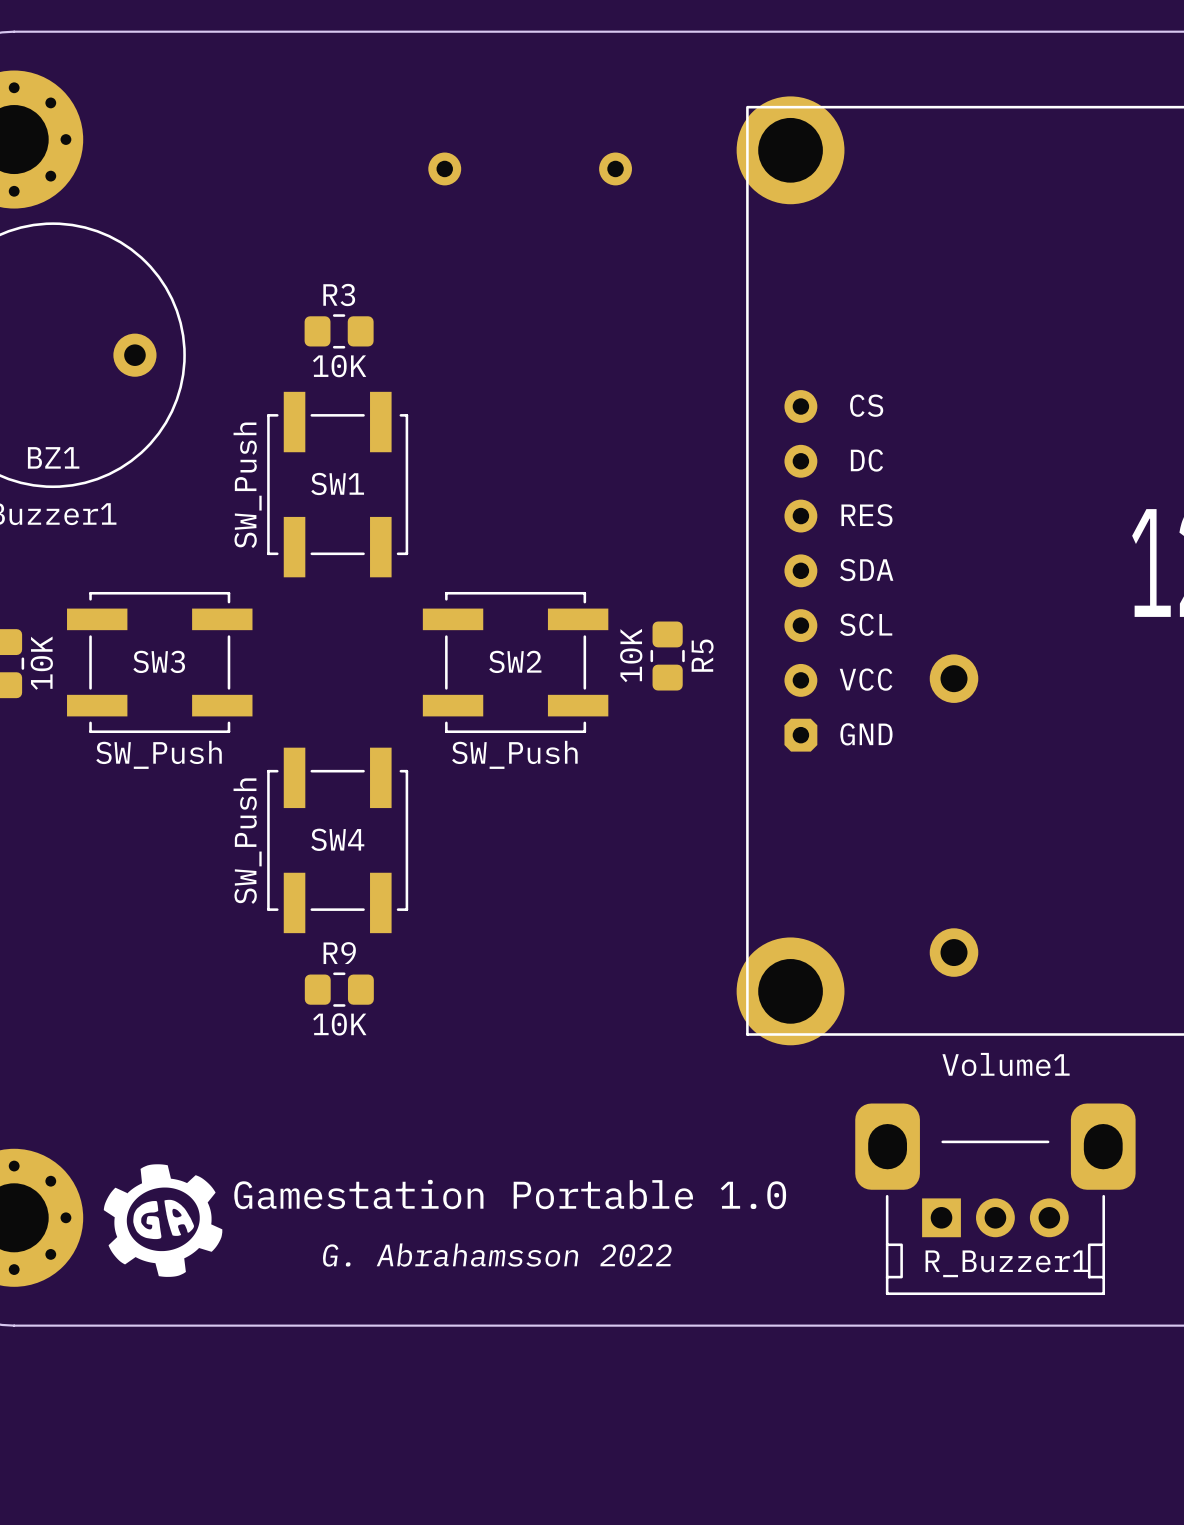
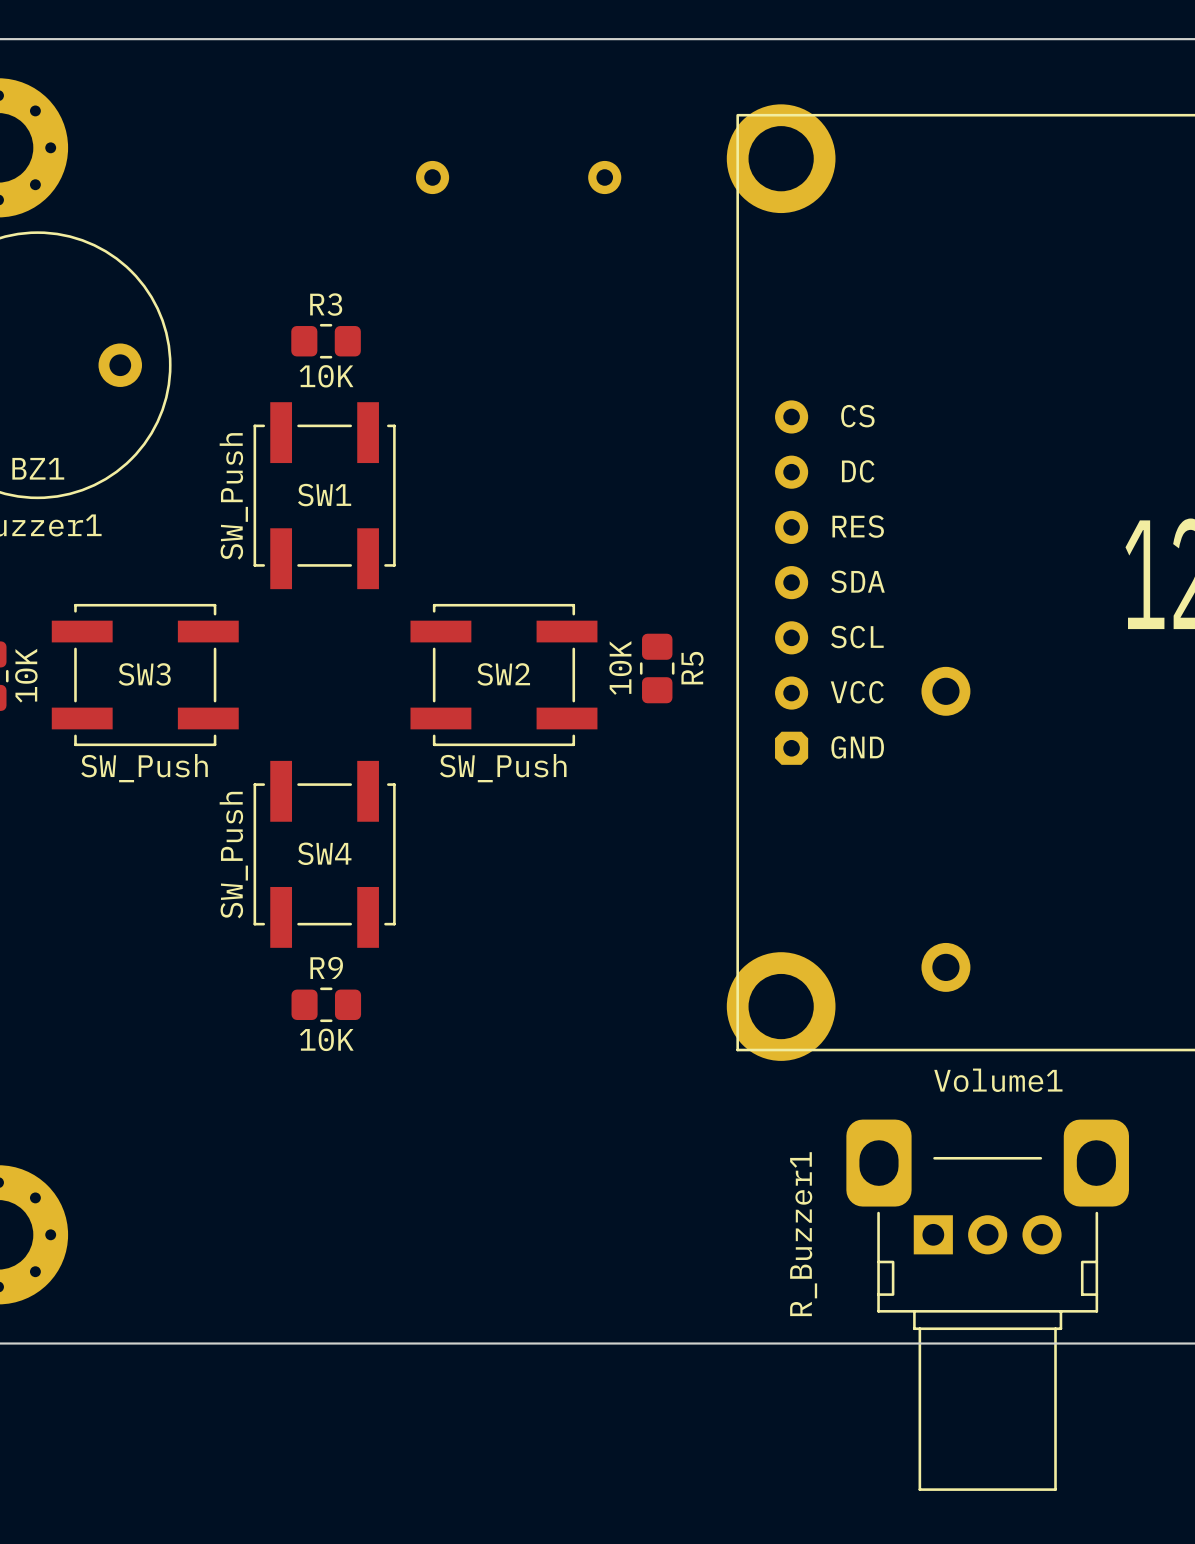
Volume1 footprint: [855, 1103, 1136, 1296] -> [846, 1119, 1129, 1491]
drawing: [103, 1164, 223, 1277] -> none
text: Gamestation Portable 1.0 (510, 1194) -> none
text: G. Abrahamsson 2022 (497, 1255) -> none
Volume1 value position: R_Buzzer1 (1006, 1263) -> R_Buzzer1 (803, 1234)

